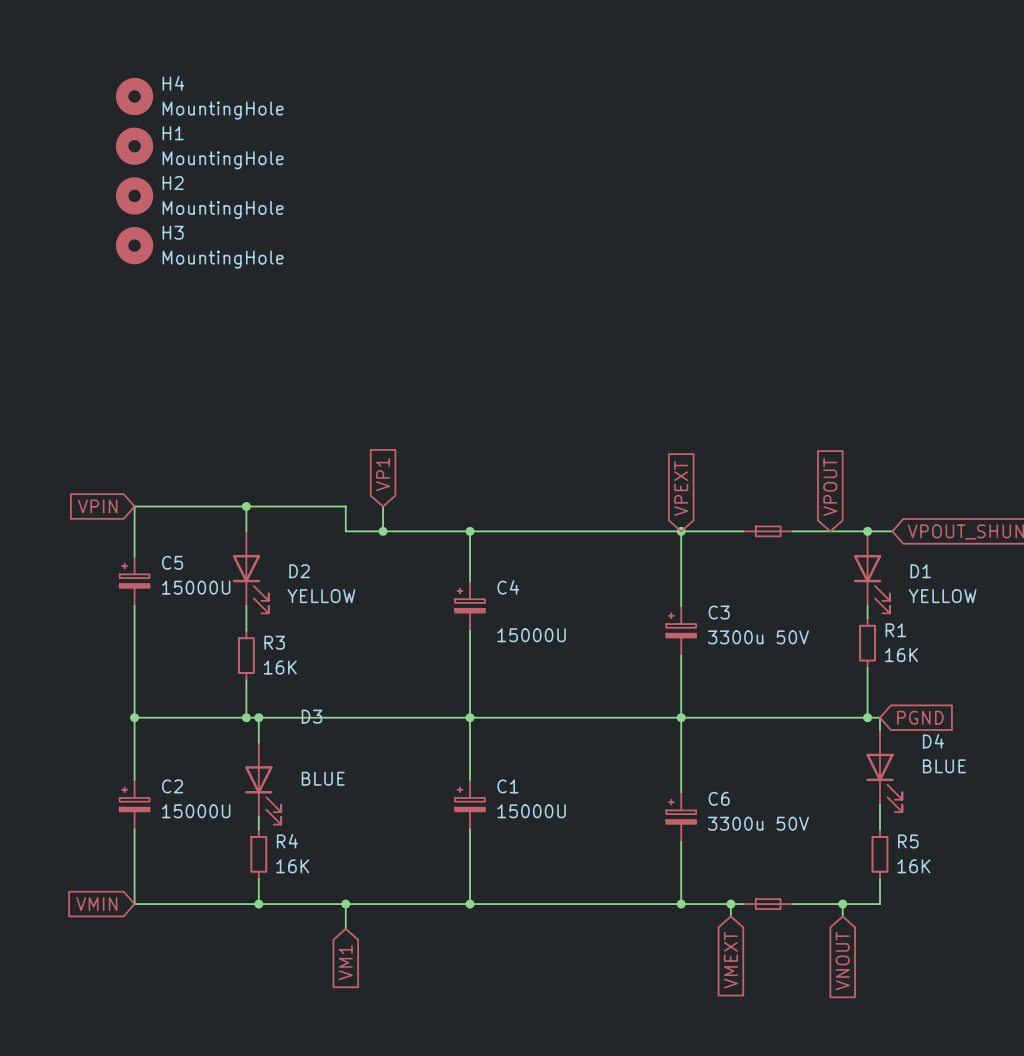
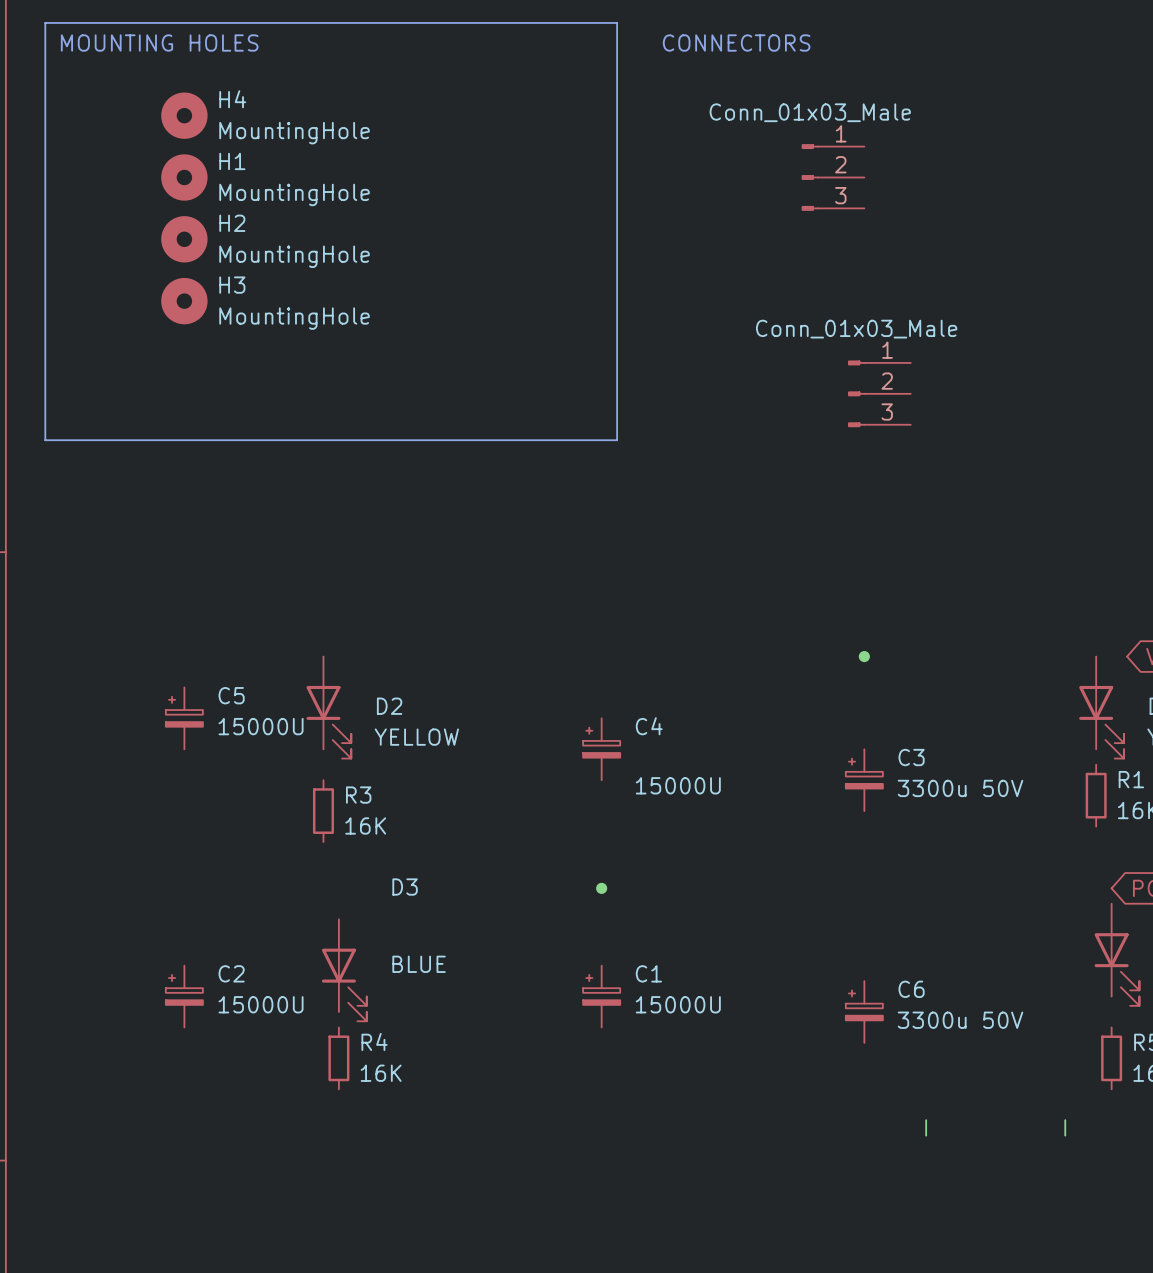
line: none -> (45, 22) (617, 22) (617, 440) (45, 440) (45, 22)
text: none -> MOUNTING HOLES (159, 43)
text: none -> CONNECTORS (736, 43)
part: none -> Conn_01x03_Male (832, 177)
part: none -> Conn_01x03_Male (879, 393)
global label: VP1 (383, 474) -> none
global label: VPOUT (830, 487) -> none
global label: VPEXT (681, 488) -> none
global label: VPIN (97, 506) -> none
wire: (246, 506) (246, 531) -> none
junction: (246, 506) -> none
wire: (383, 506) (383, 531) -> none
junction: (383, 531) -> none
wire: (470, 531) (470, 581) -> none
junction: (470, 531) -> none
wire: (681, 531) (681, 605) -> none
wire: (743, 531) (345, 531) (345, 506) (134, 506) (134, 556) -> none
part: (768, 531) -> none
wire: (793, 531) (892, 531) -> none
junction: (867, 531) -> none
wire: (134, 605) (134, 779) -> none
wire: (246, 605) (246, 630) -> none
wire: (867, 605) (867, 618) -> none
wire: (470, 630) (470, 779) -> none
wire: (681, 655) (681, 792) -> none
wire: (867, 668) (867, 717) -> none
wire: (246, 680) (246, 717) -> none
wire: (134, 717) (879, 717) (879, 730) -> none
junction: (134, 717) -> none
junction: (246, 717) -> none
wire: (258, 717) (258, 742) -> none
junction: (258, 717) -> none
junction: (681, 717) -> none
junction: (867, 717) -> none
wire: (879, 804) (879, 829) -> none
wire: (258, 817) (258, 829) -> none
wire: (134, 829) (134, 904) (743, 904) -> none
wire: (470, 829) (470, 904) -> none
wire: (681, 841) (681, 904) -> none
wire: (258, 879) (258, 904) -> none
wire: (879, 879) (879, 904) (793, 904) -> none
global label: VMIN (96, 904) -> none
junction: (258, 904) -> none
wire: (345, 904) (345, 928) -> none
junction: (345, 904) -> none
junction: (470, 904) -> none
junction: (681, 904) -> none
junction: (730, 904) -> none
part: (768, 904) -> none
junction: (842, 904) -> none
global label: VMEXT (730, 960) -> none
global label: VNOUT (842, 961) -> none
global label: VM1 (345, 962) -> none

